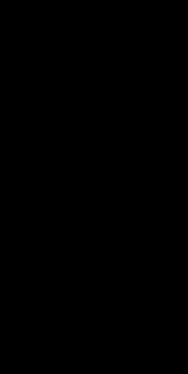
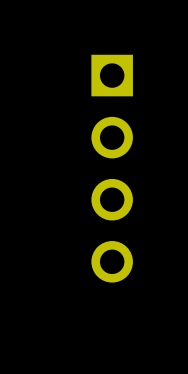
part: none -> (112, 168)

